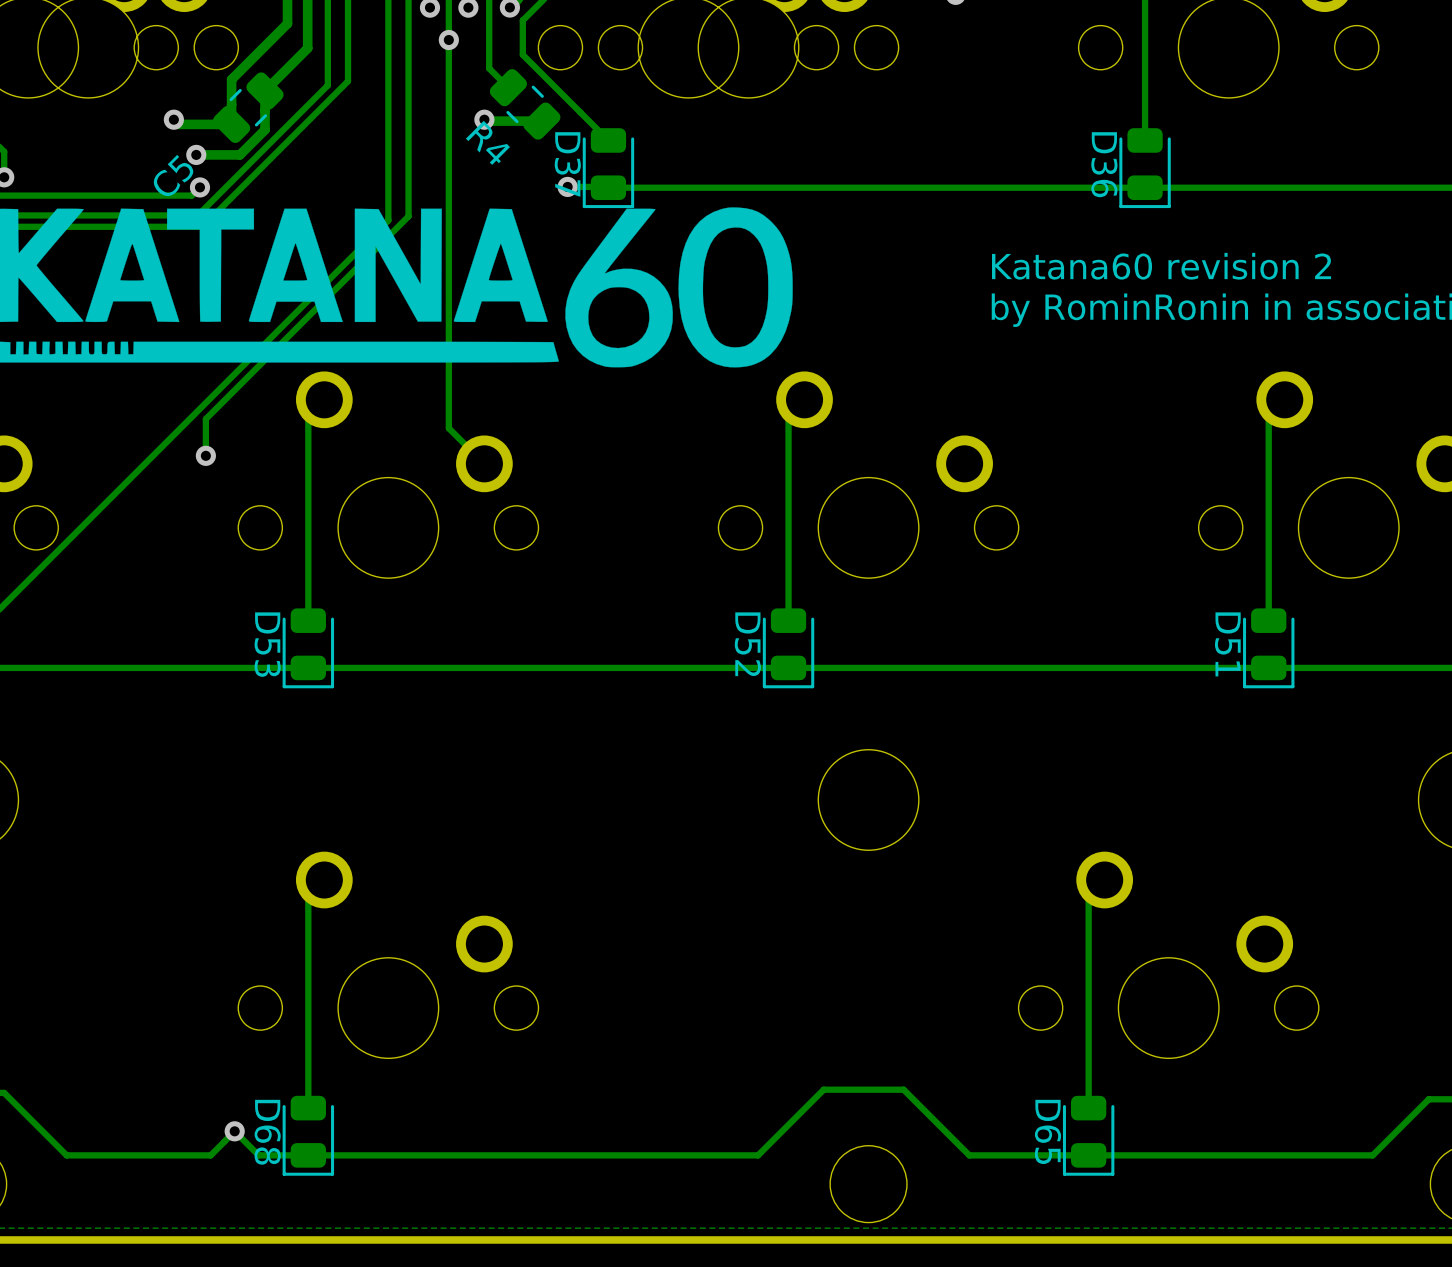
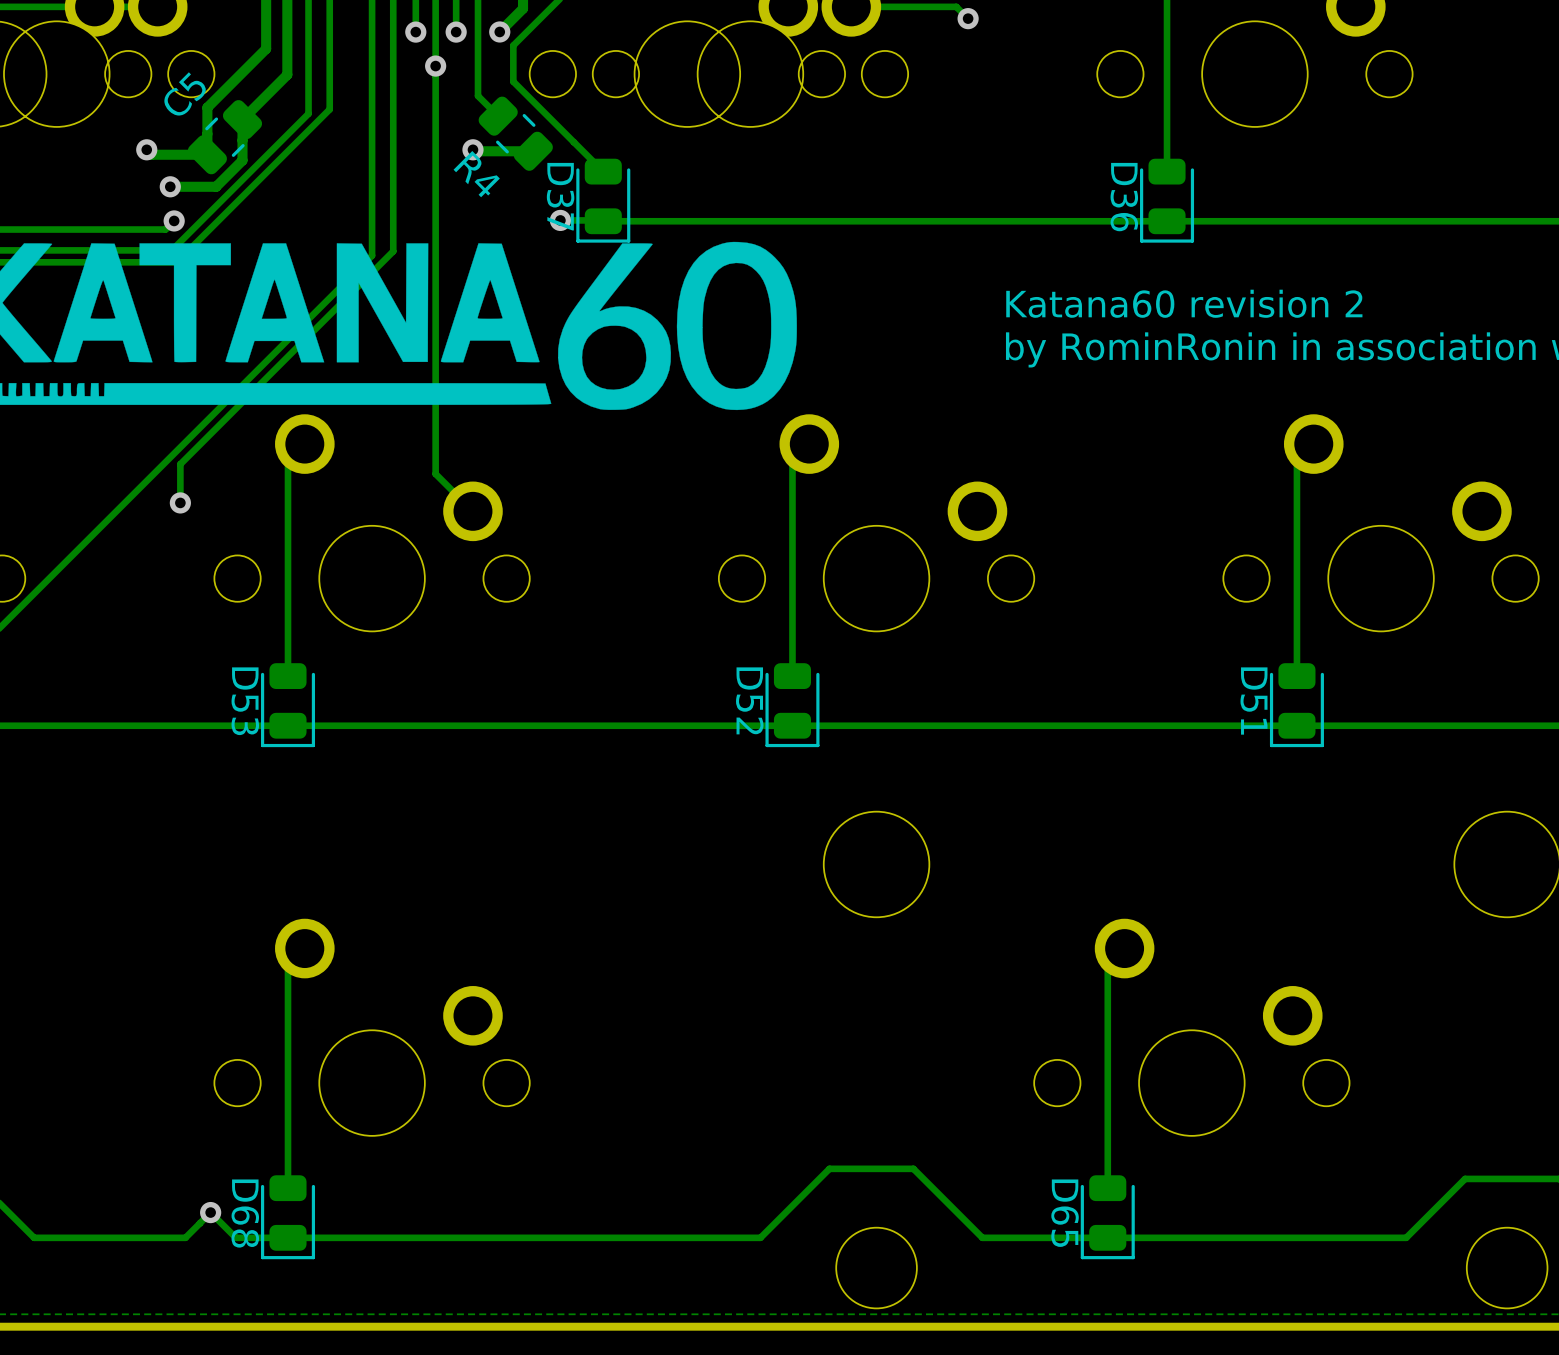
C5 name position: C5 (173, 175) -> C5 (185, 93)

